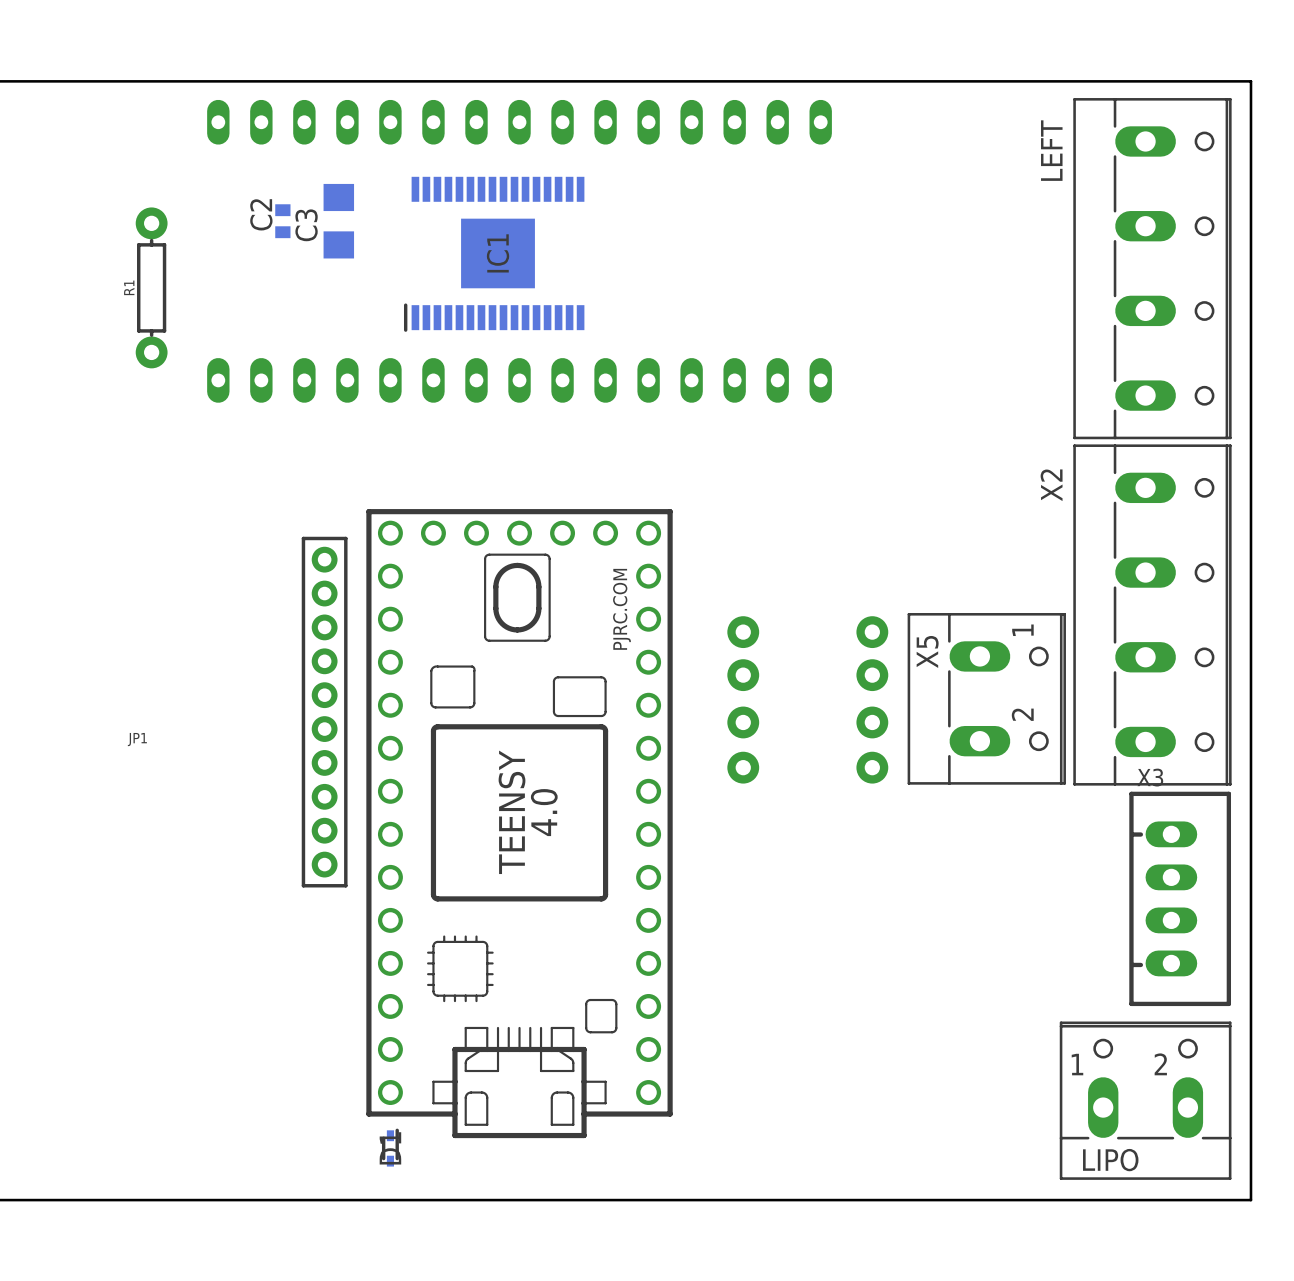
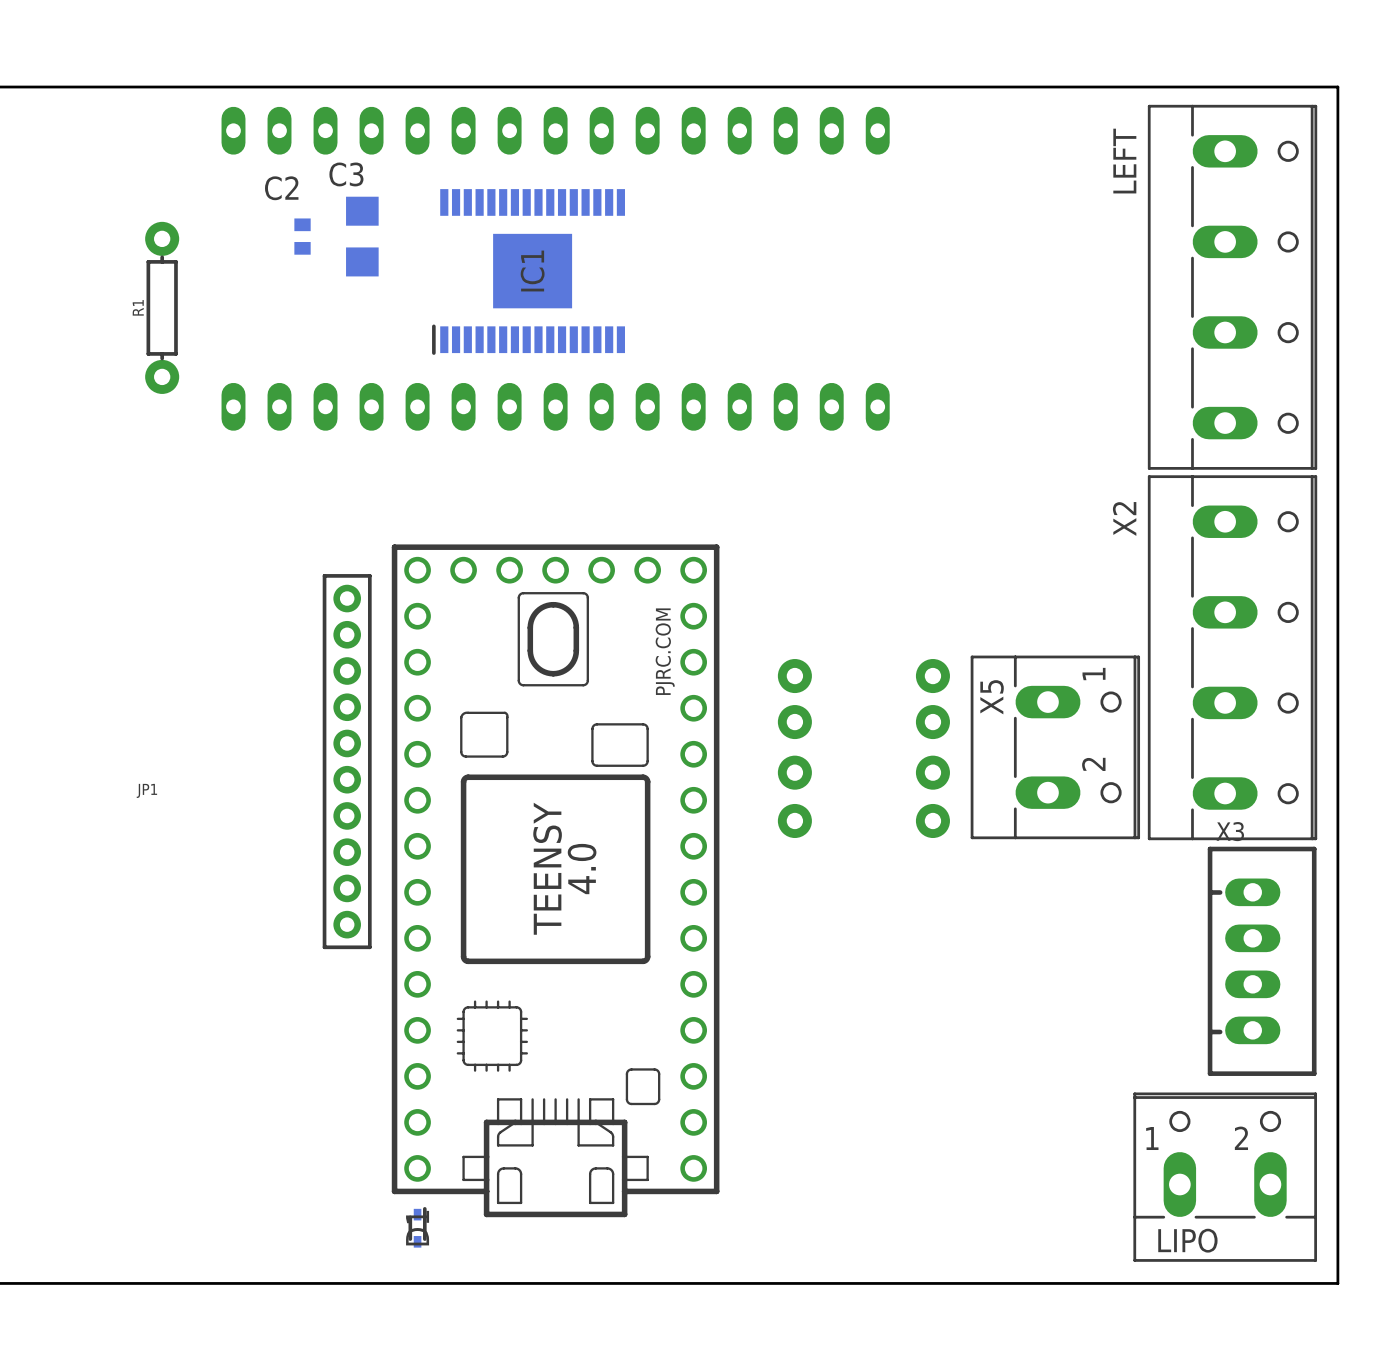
C2 name rotation: 0° (261, 214) -> 90° clockwise (281, 188)
C3 name rotation: 0° (306, 225) -> 90° clockwise (346, 174)
C3 name position: C3 (306, 225) -> C3 (346, 174)

